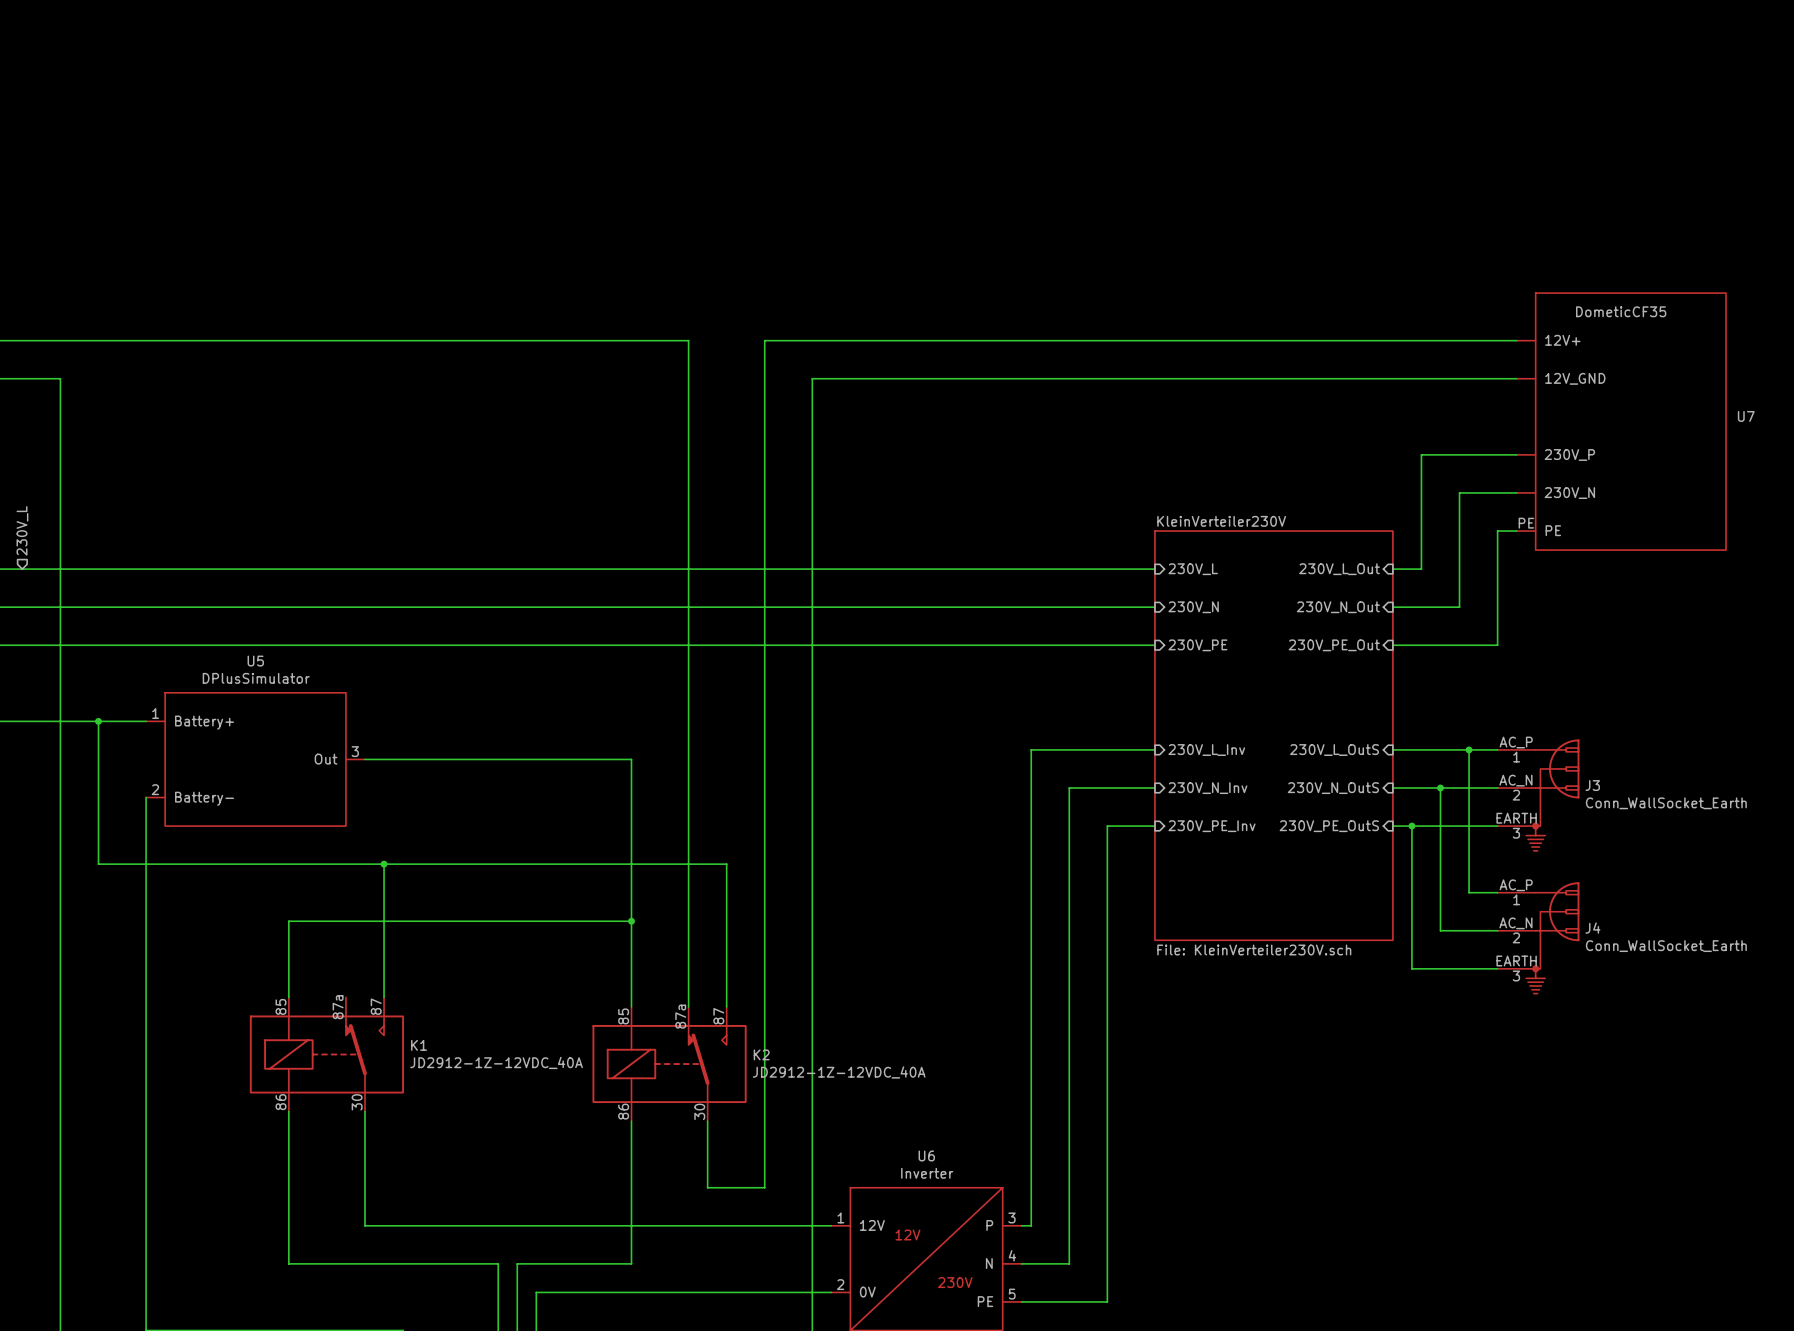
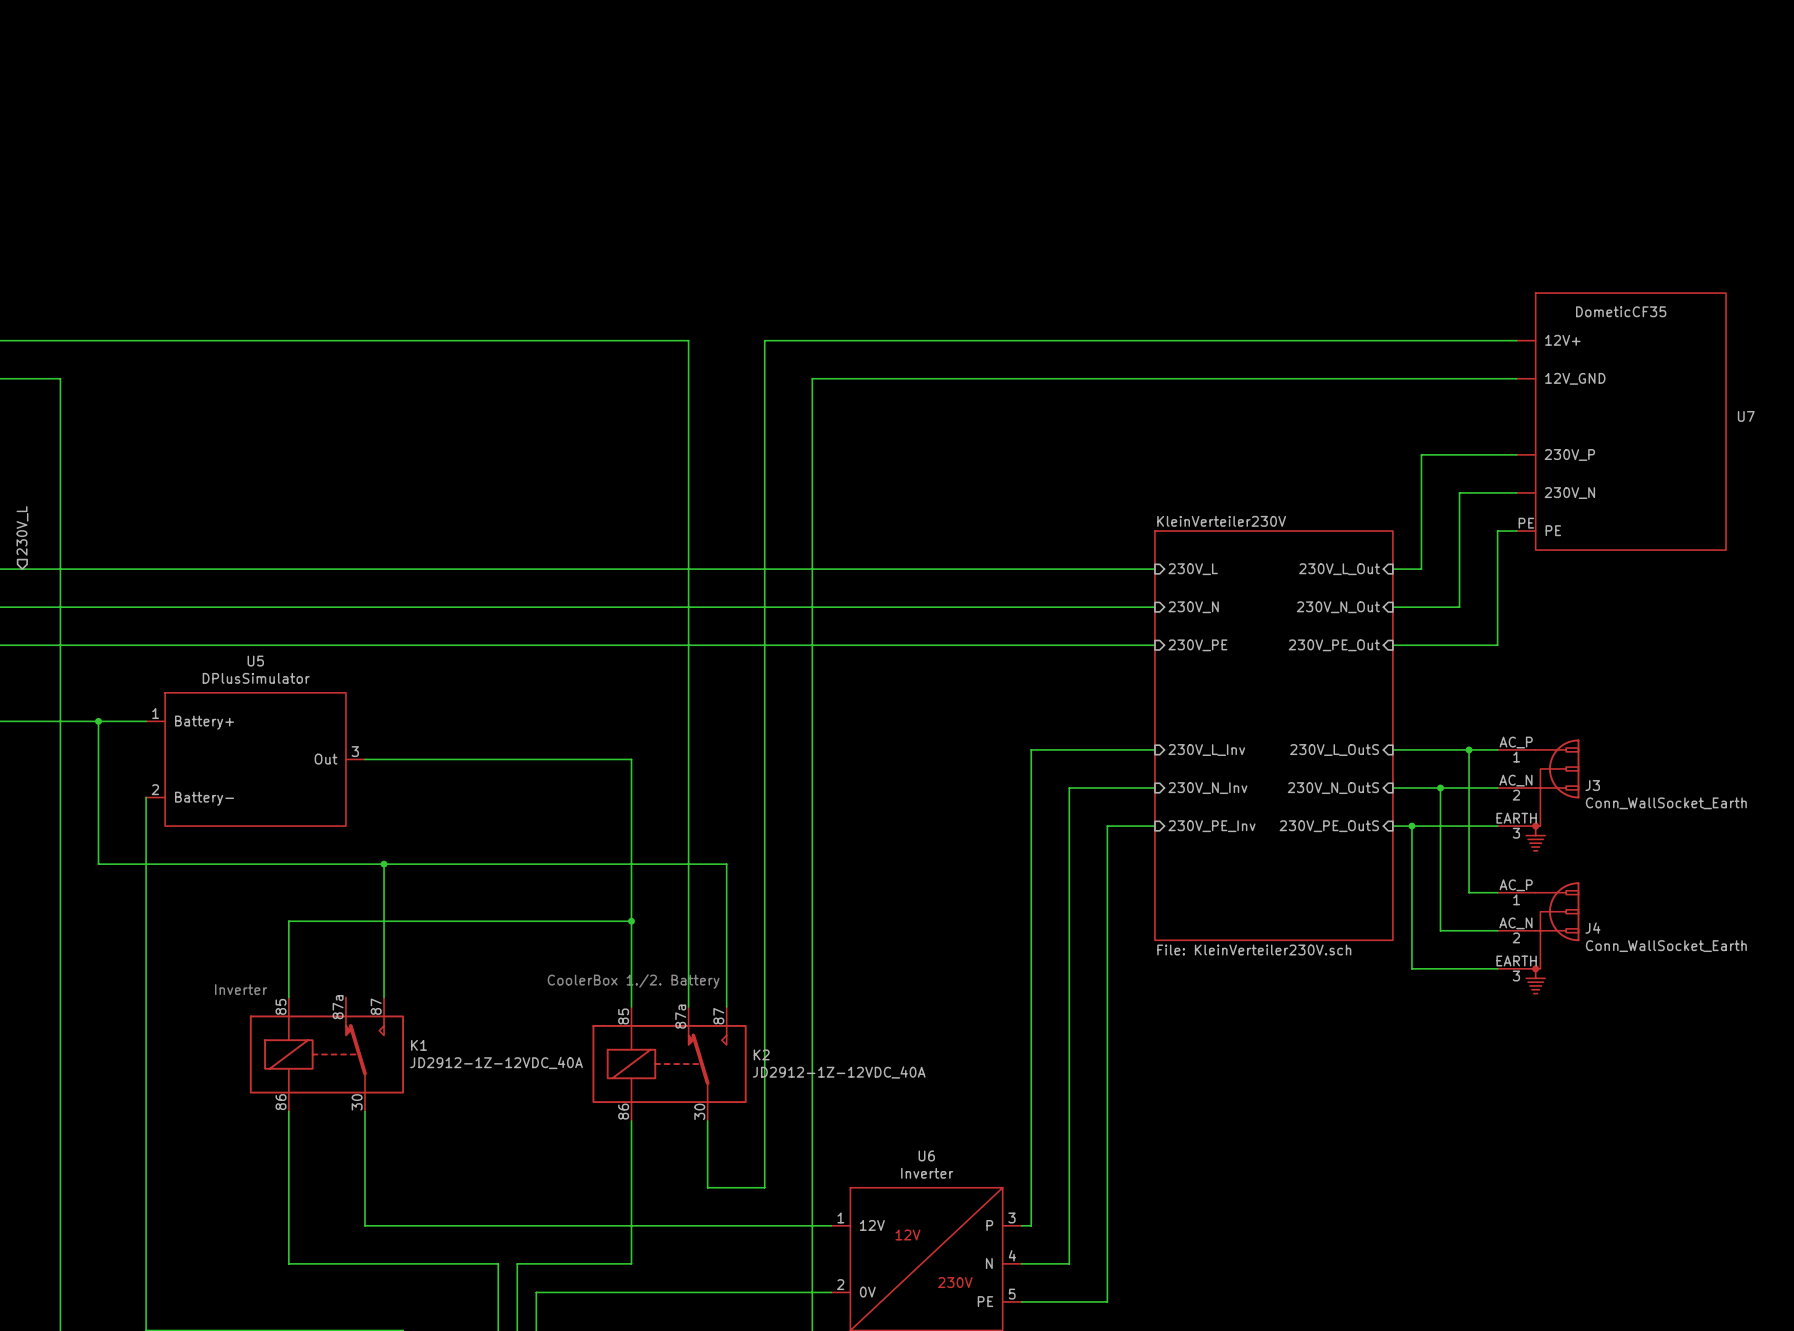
text: none -> CoolerBox 1./2. Battery (633, 981)
text: none -> Inverter (241, 989)

